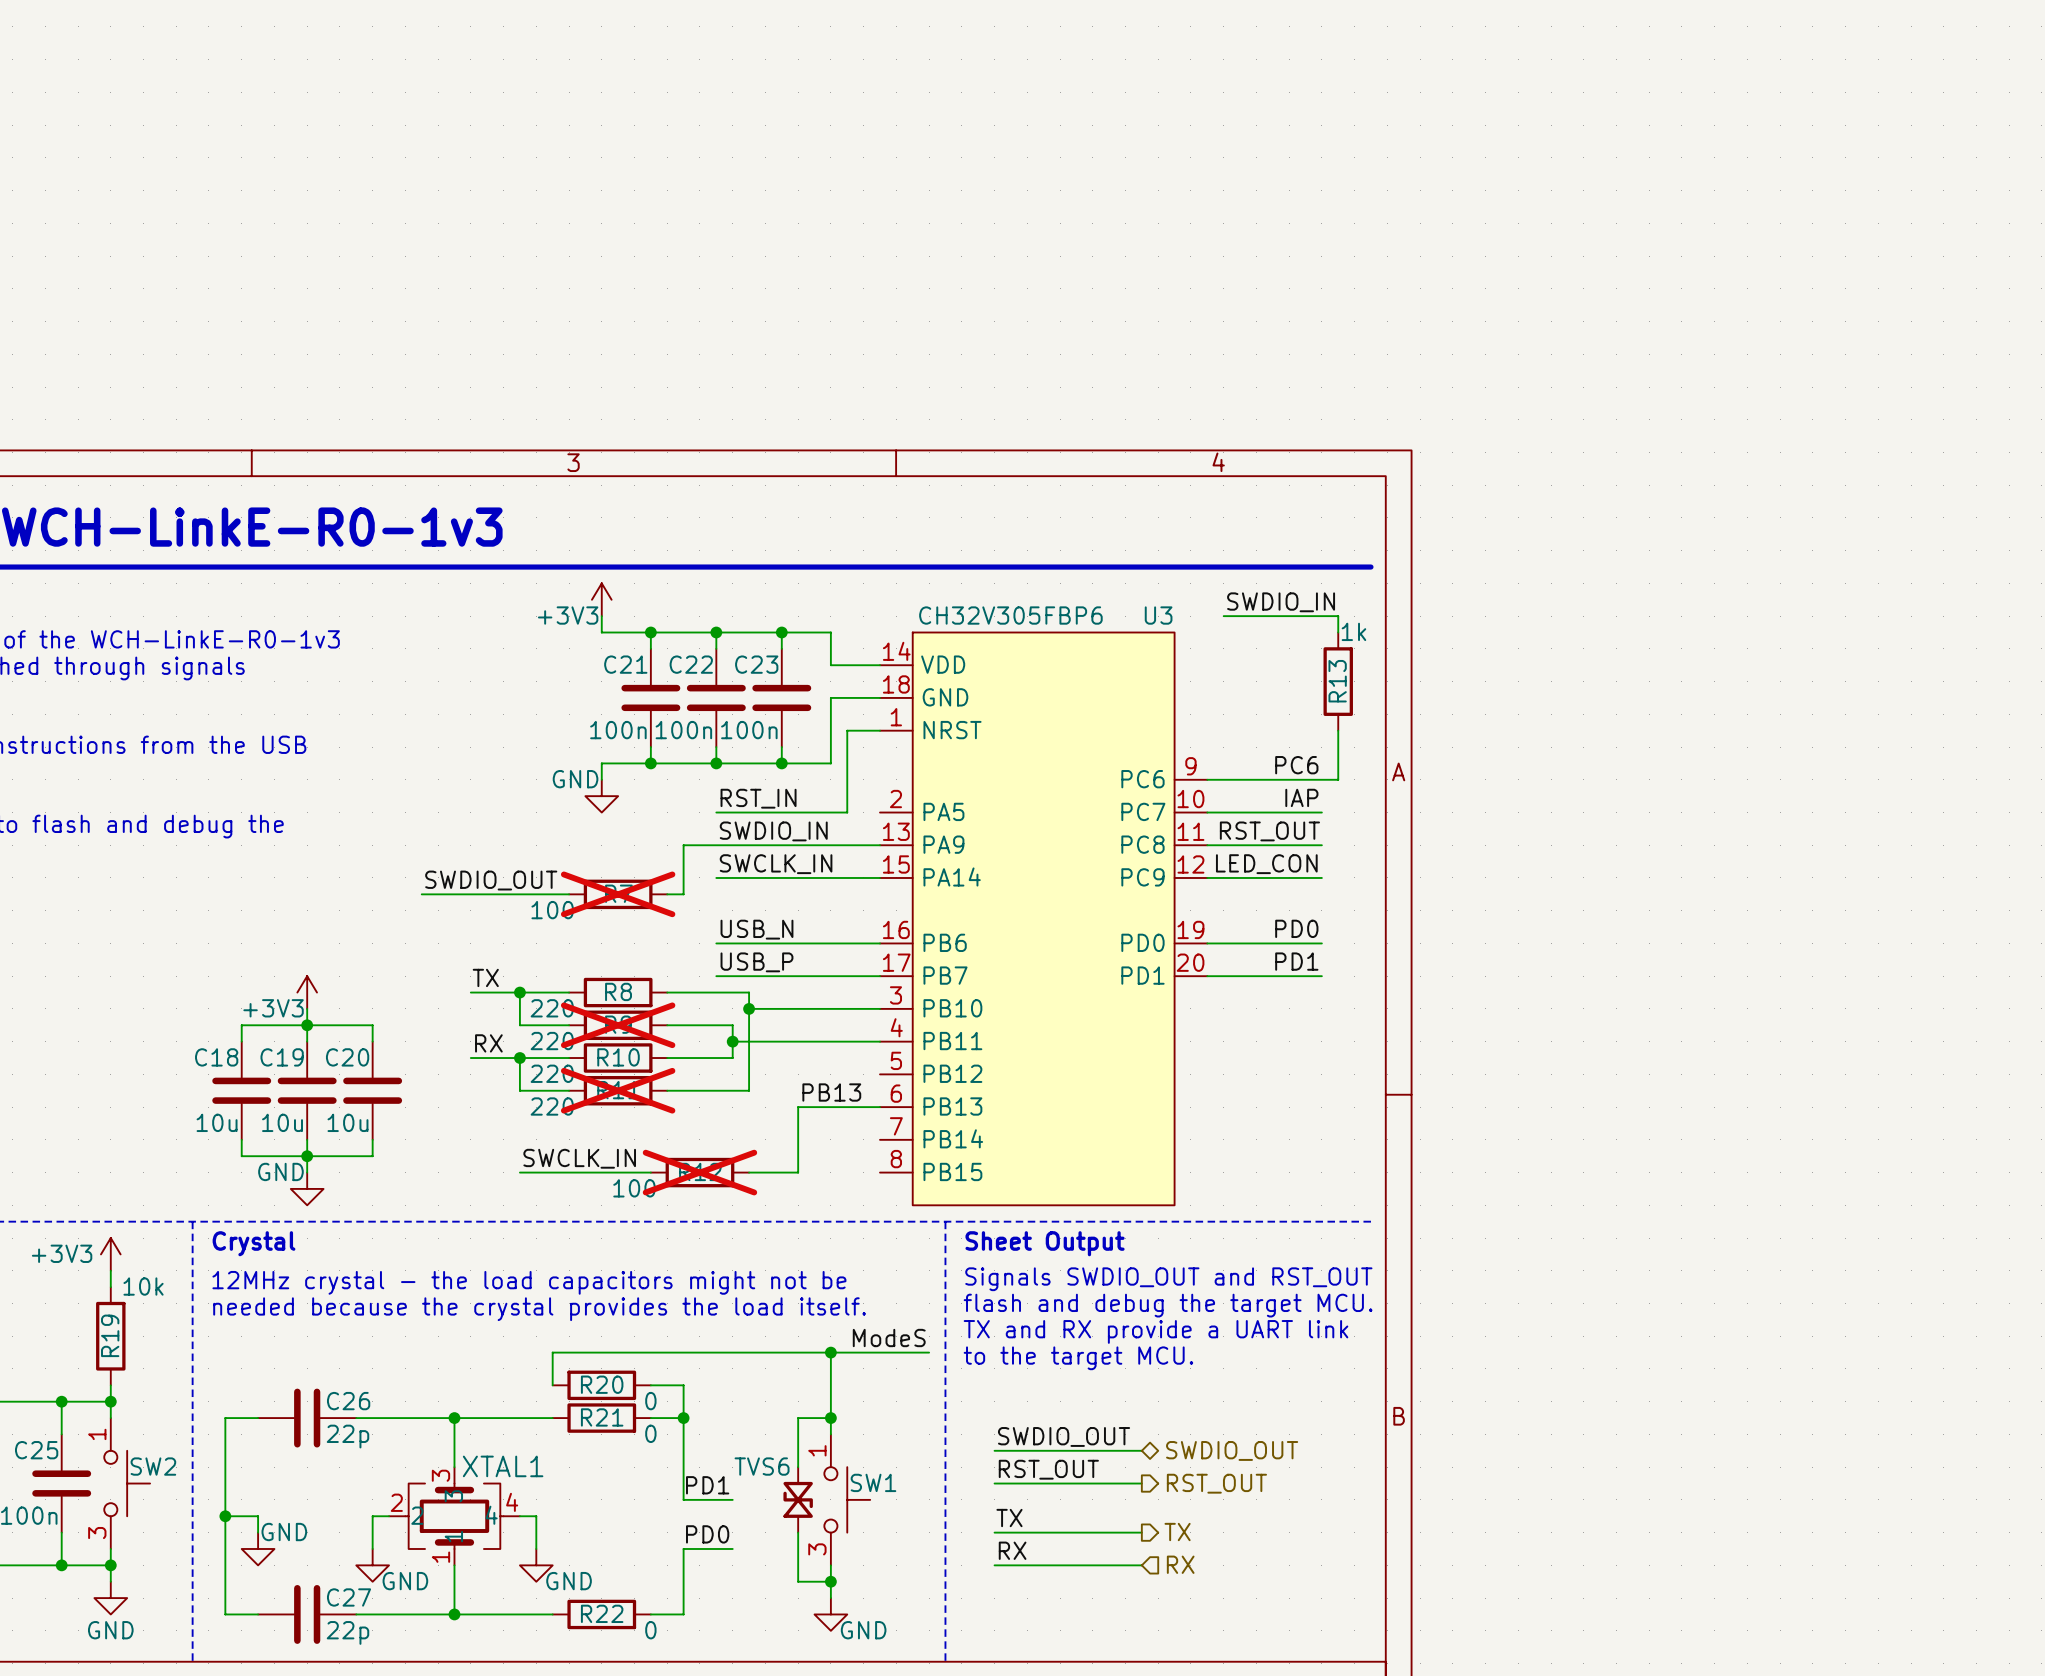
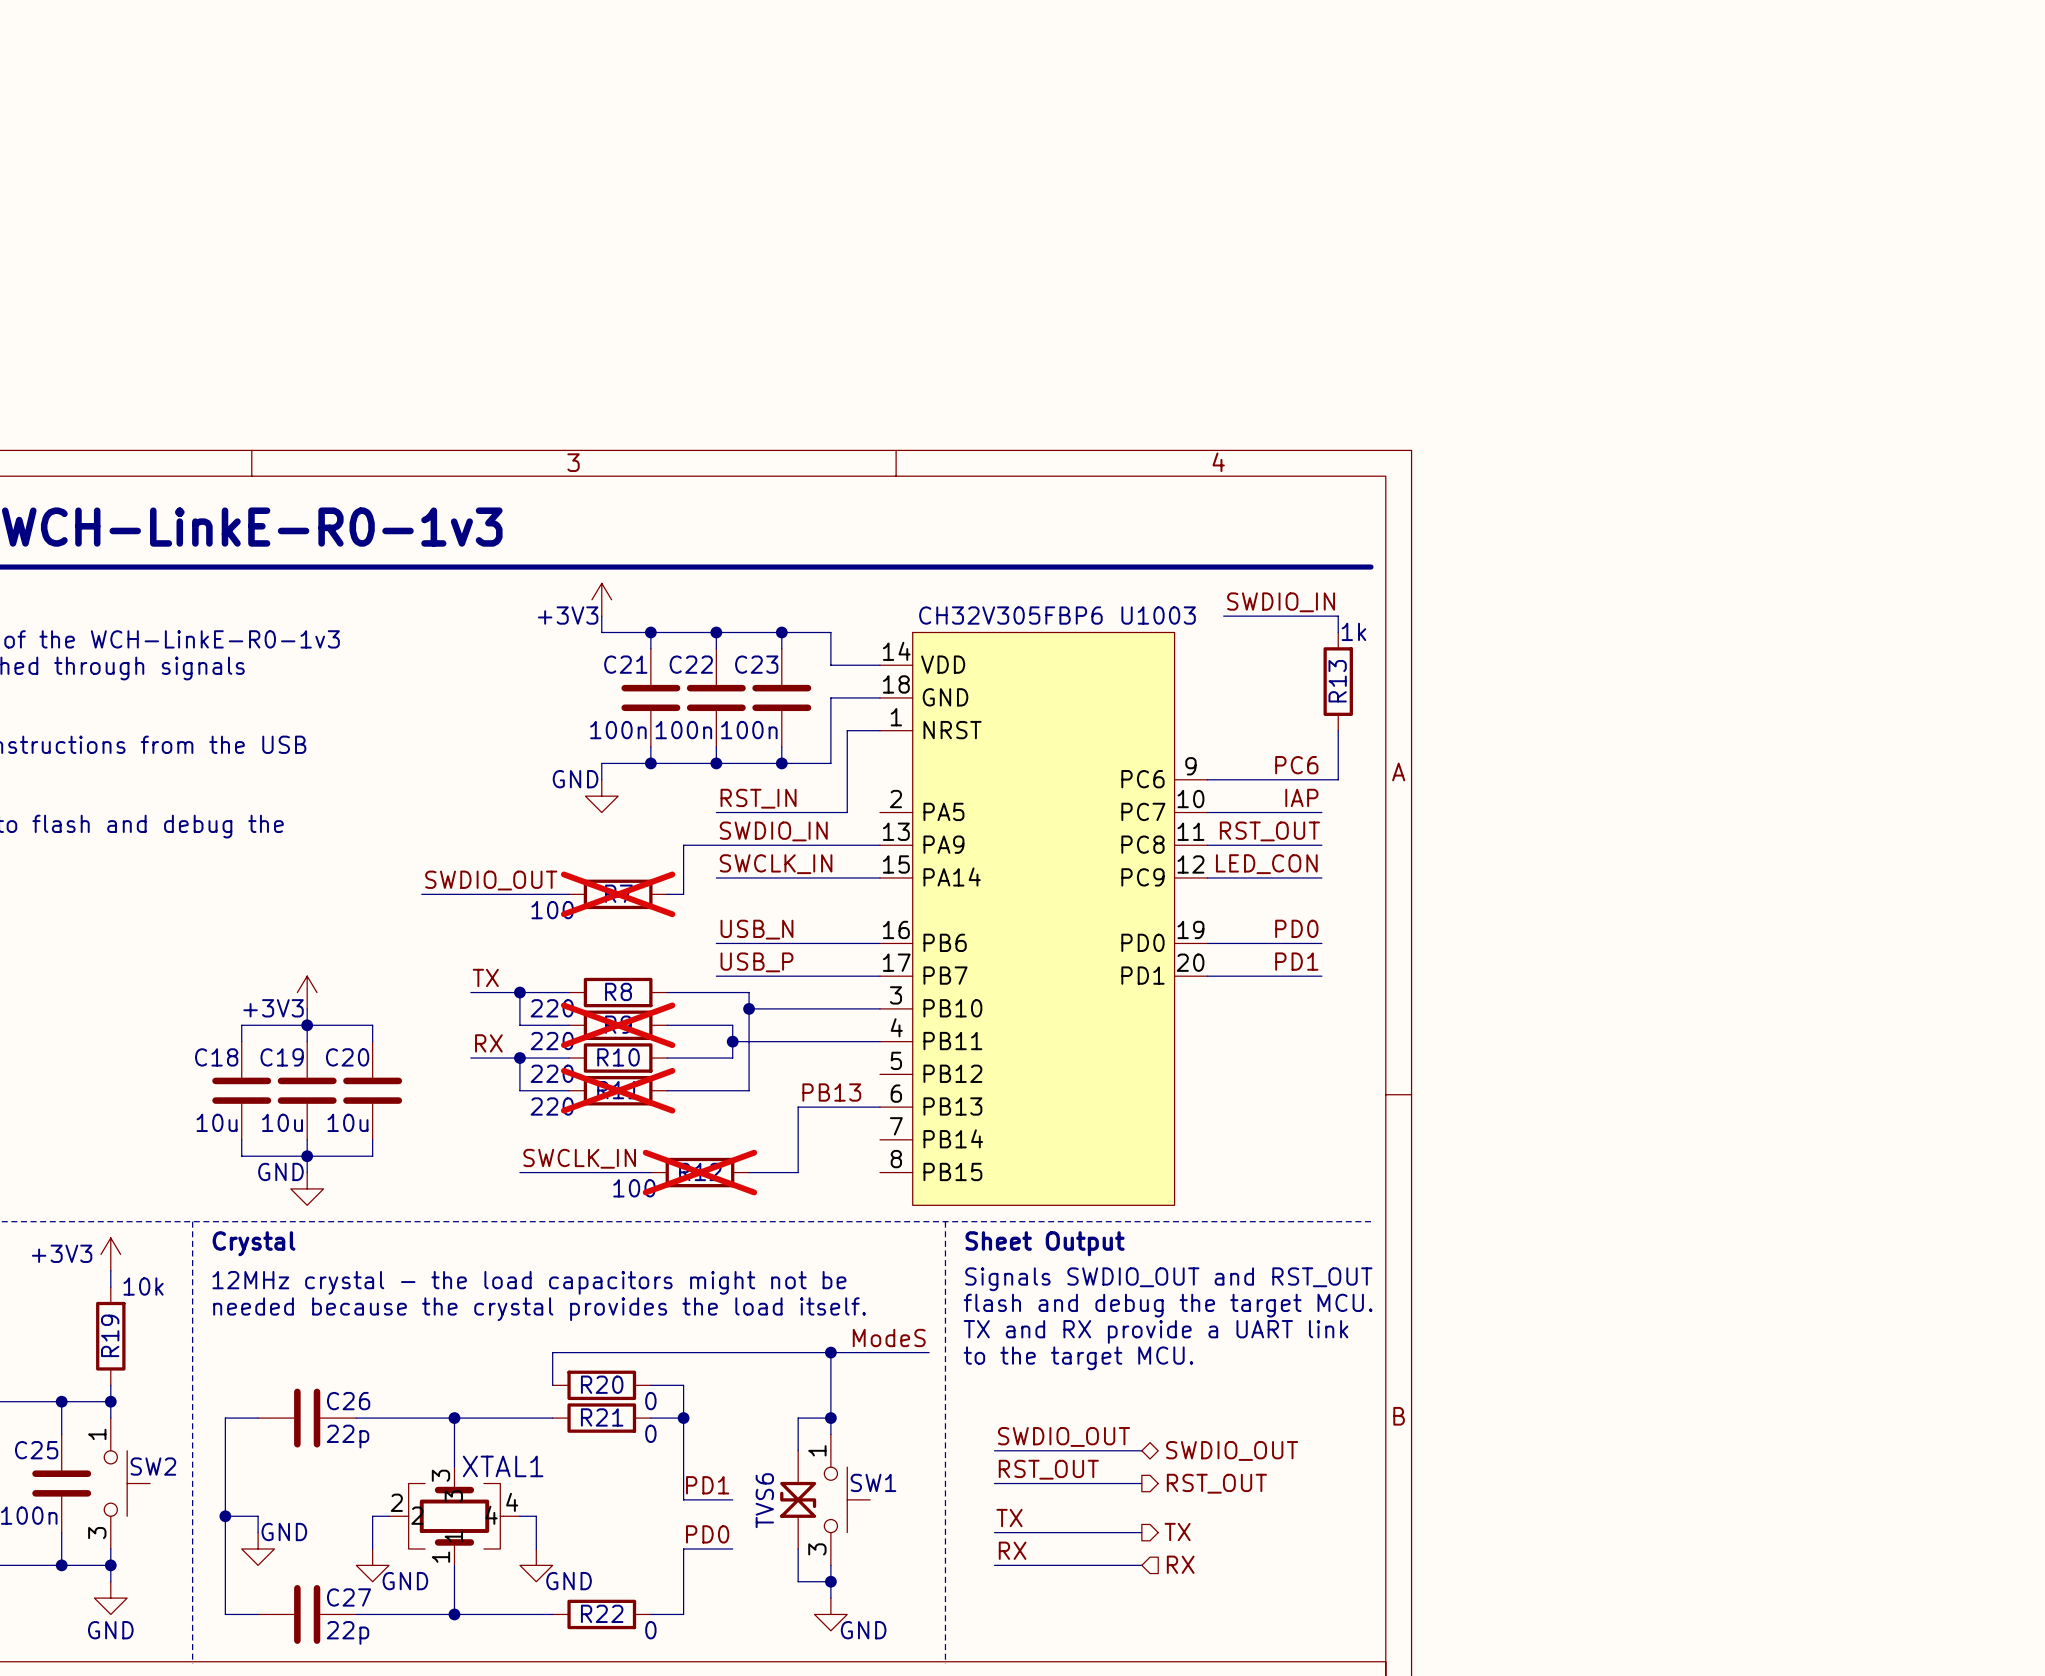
U3 name: U3 (1158, 615) -> U1003 (1158, 615)
TVS6 name position: TVS6 (762, 1466) -> TVS6 (764, 1500)
TVS6 symbol: [783, 1467, 813, 1533] -> [780, 1450, 817, 1549]

